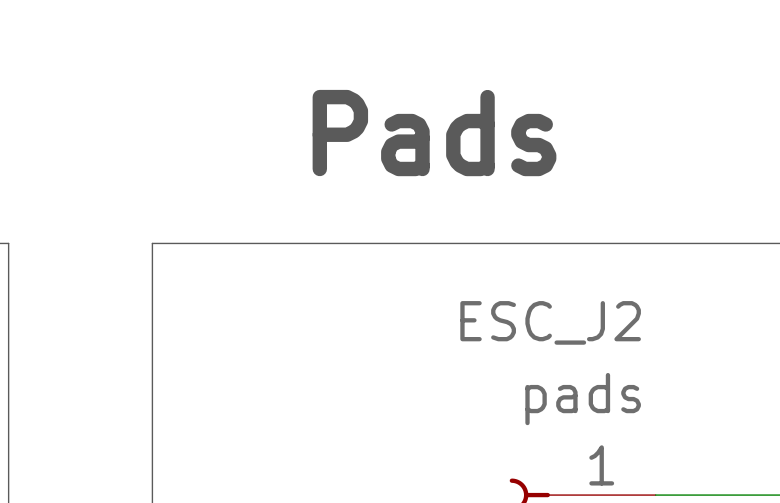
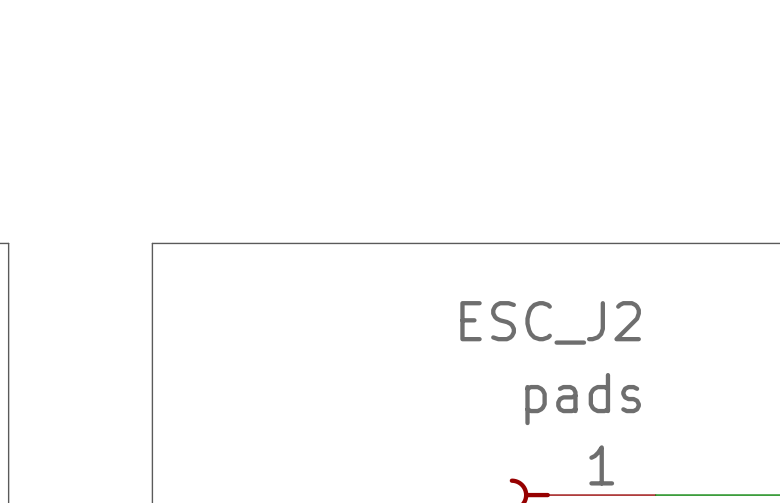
text: Pads (434, 133) -> none

